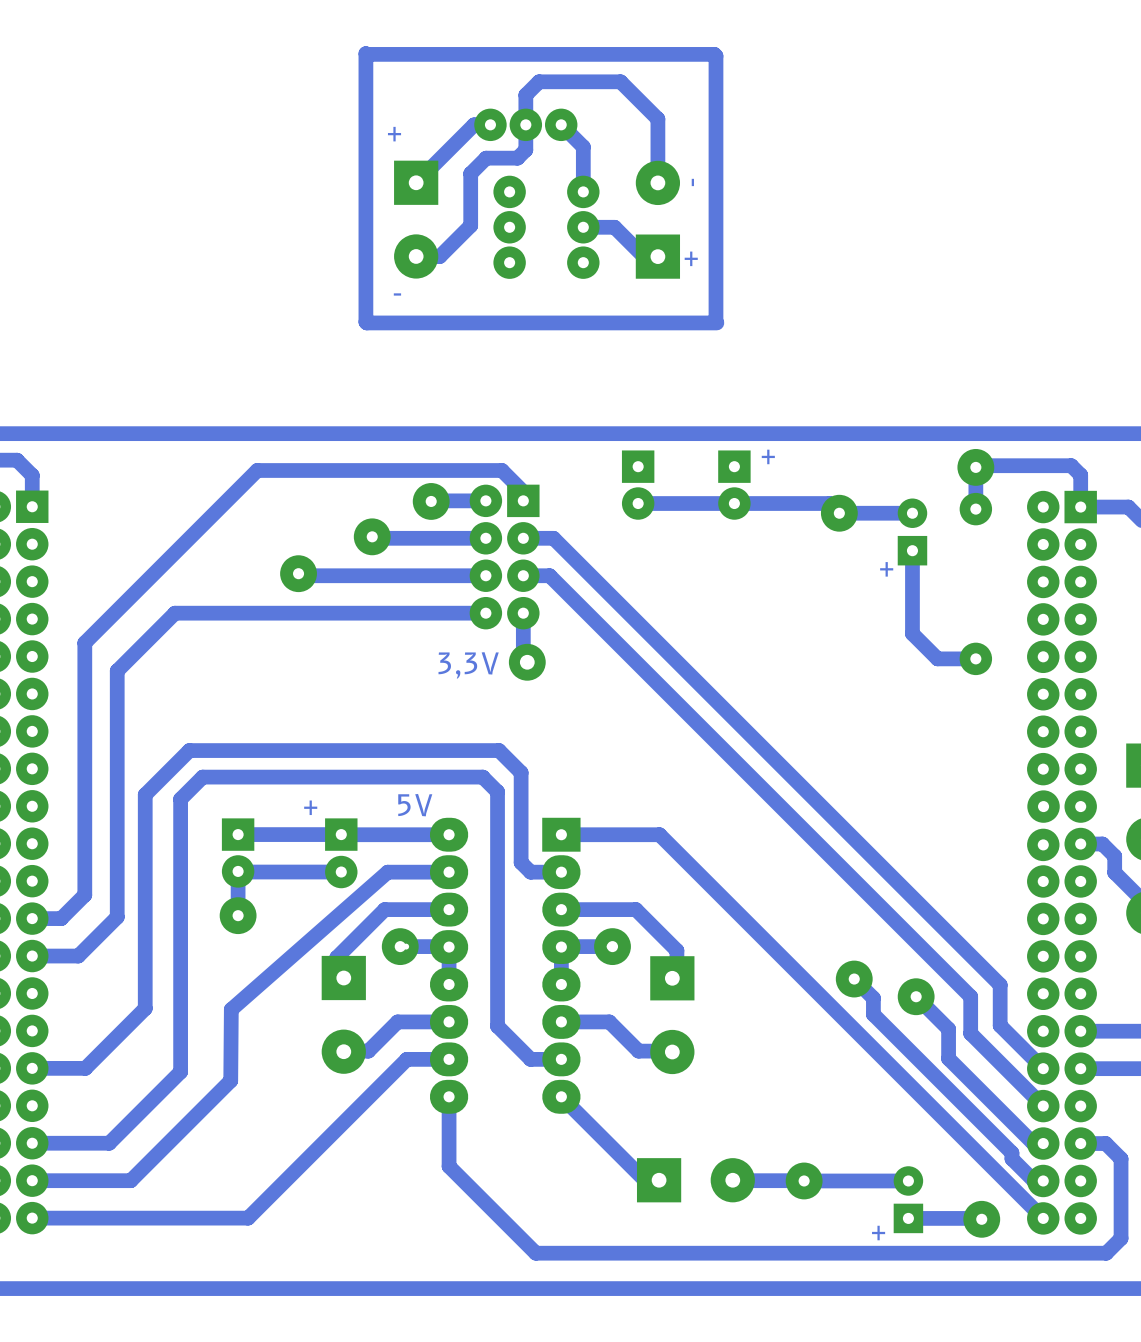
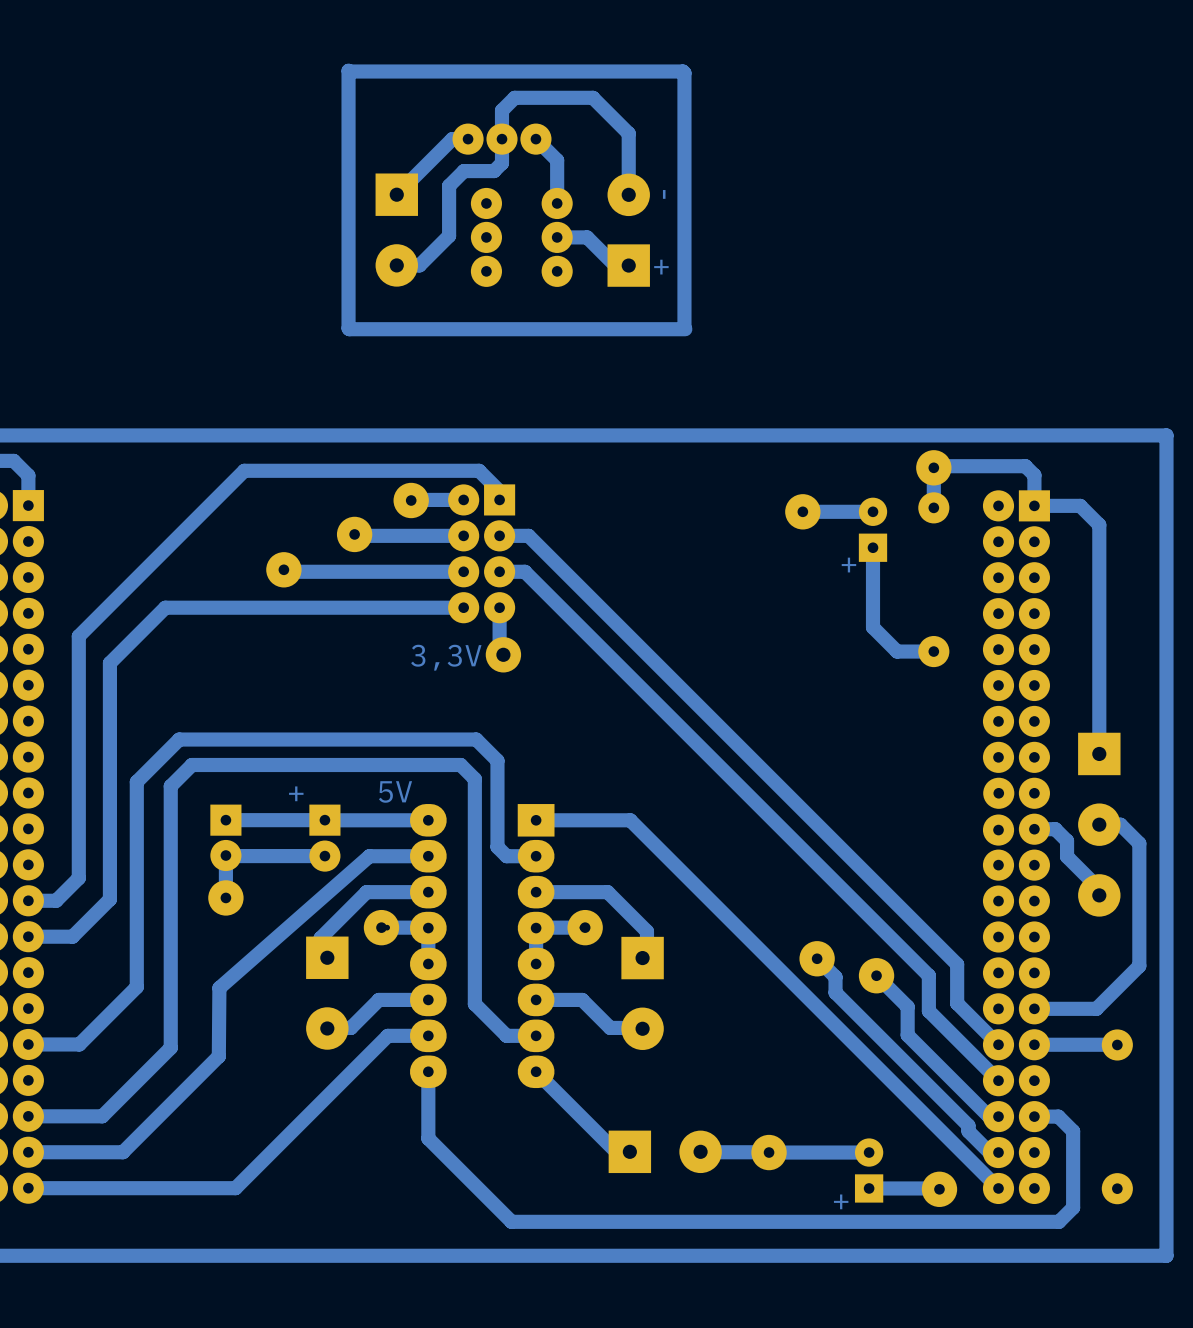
text: + (394, 134) -> none
text: - (397, 294) -> none
text: + (768, 456) -> none
part: (638, 485) -> none
part: (734, 485) -> none
track: (637, 504) (829, 503) (839, 513) -> none

